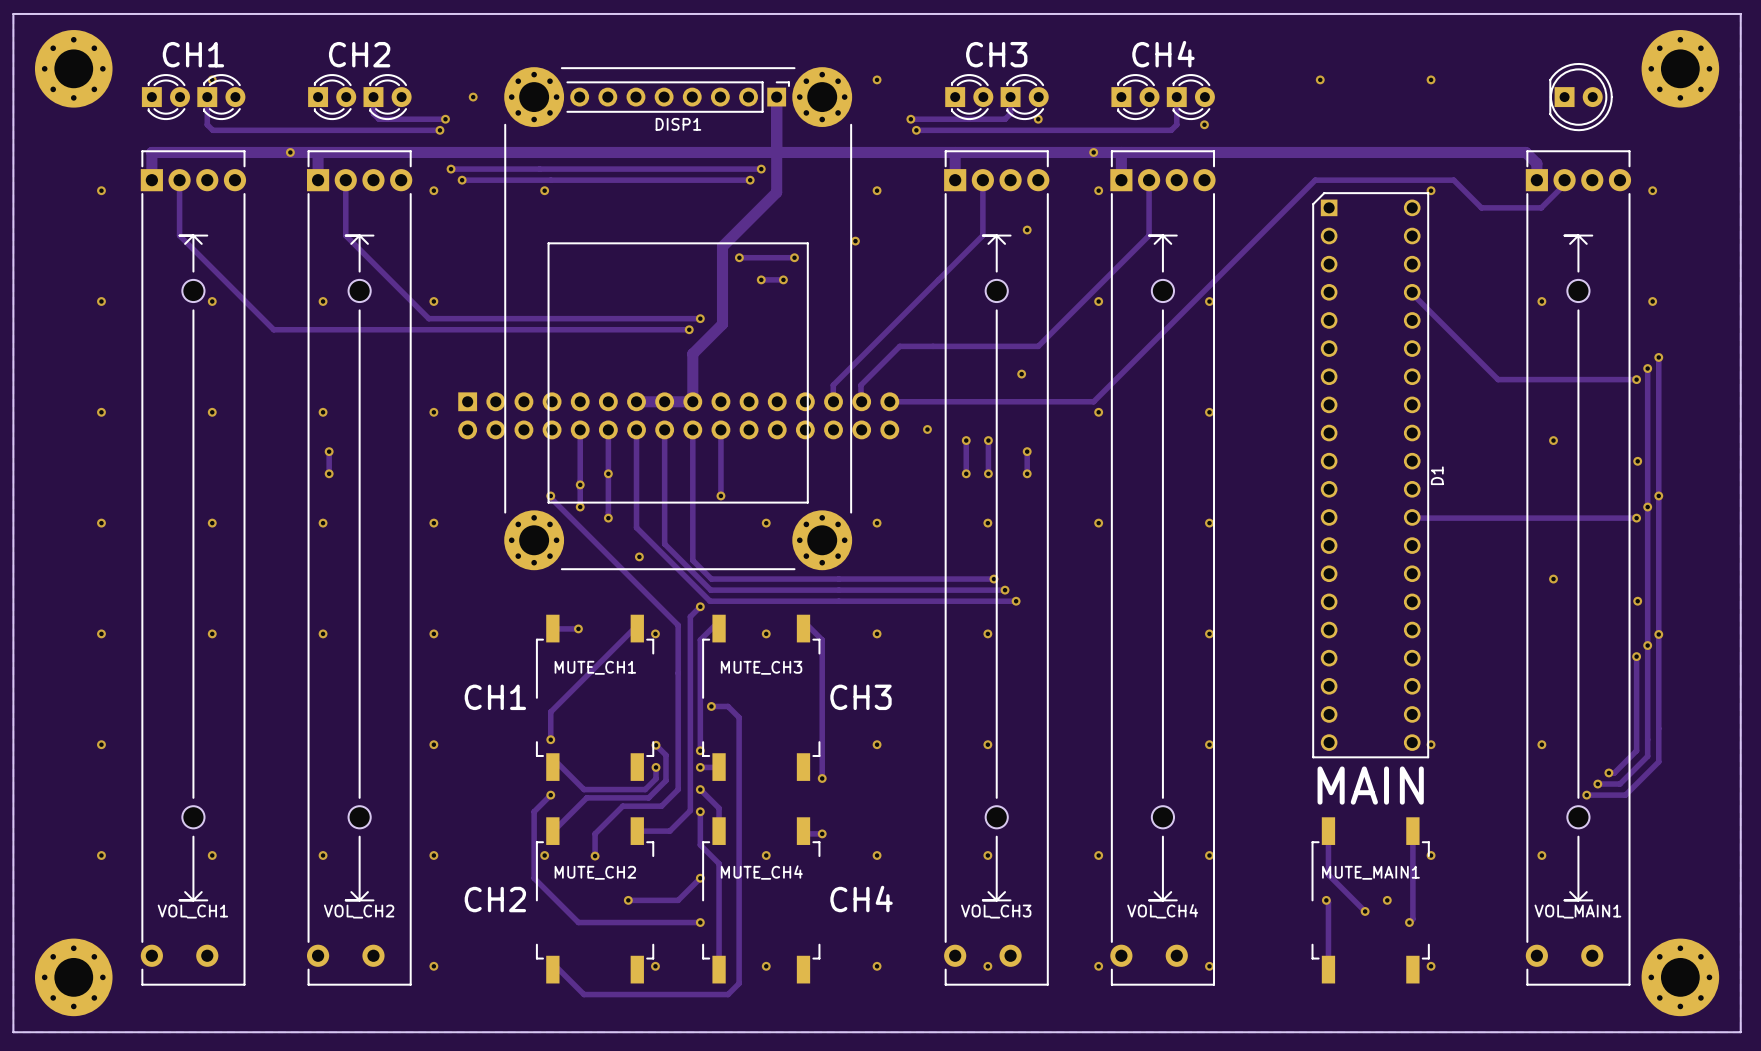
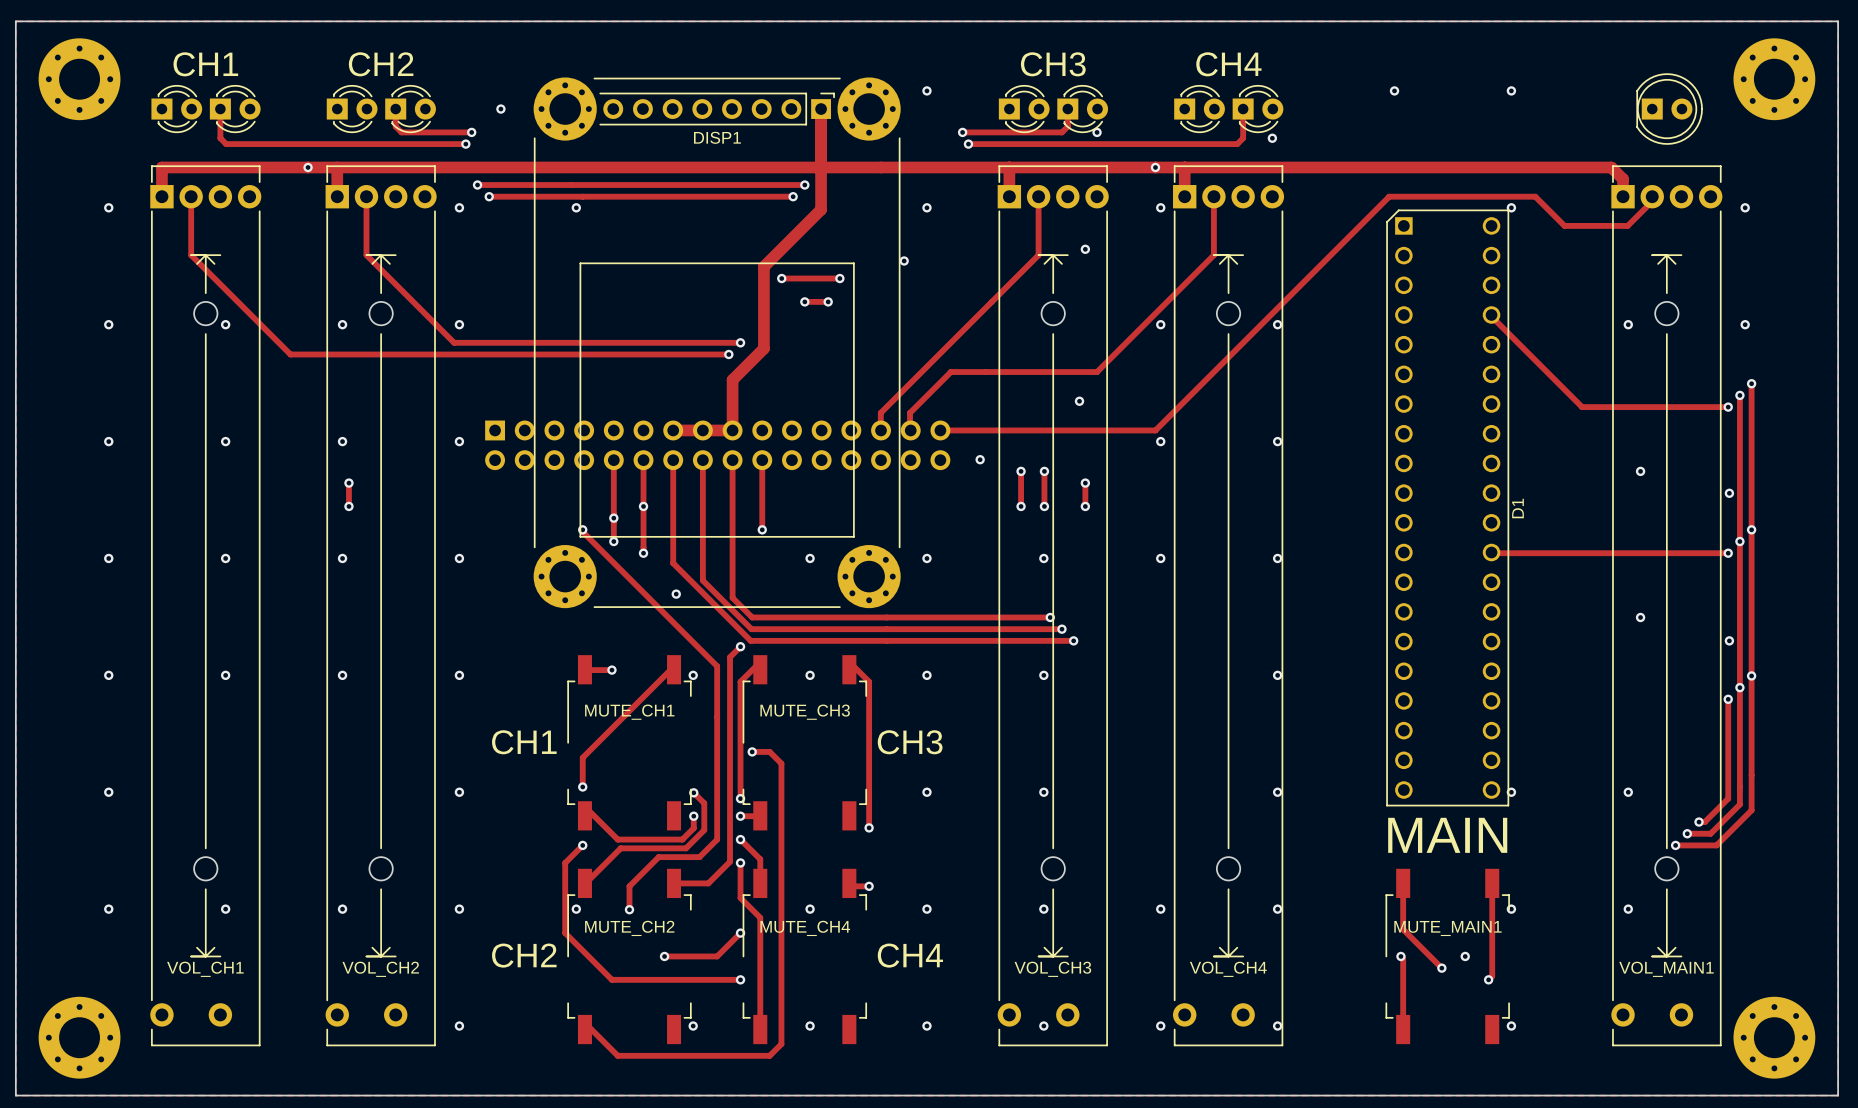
via: (212, 79) -> none

